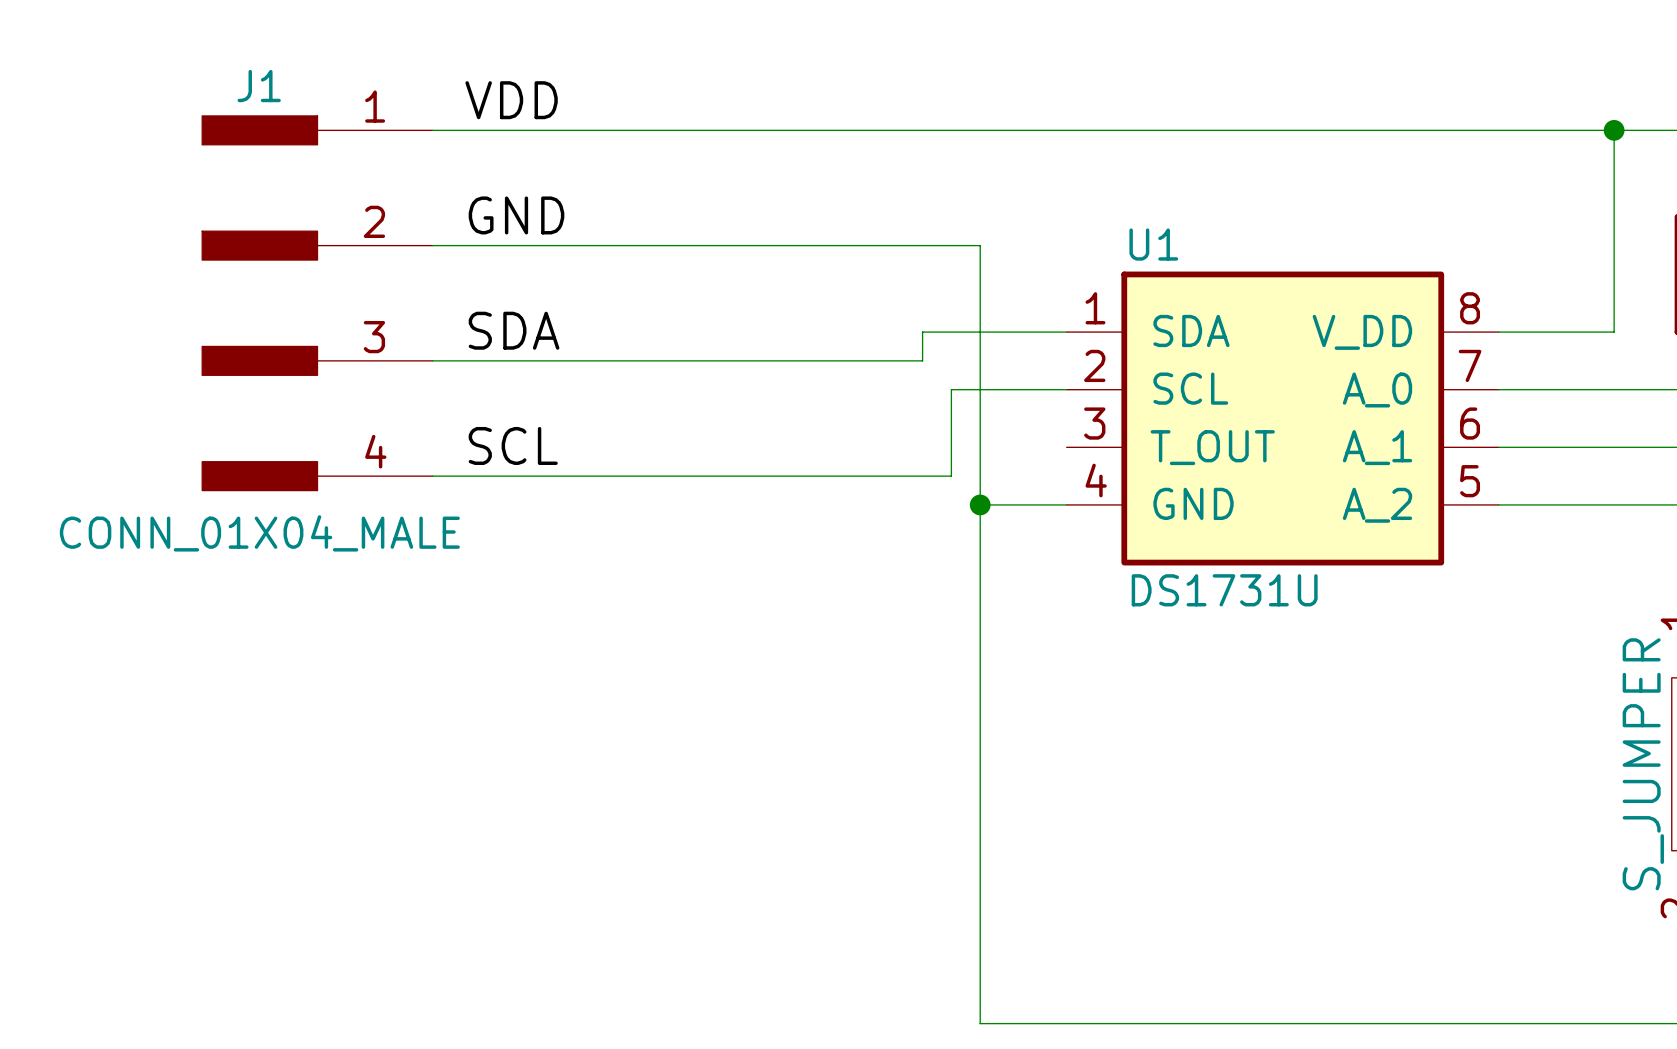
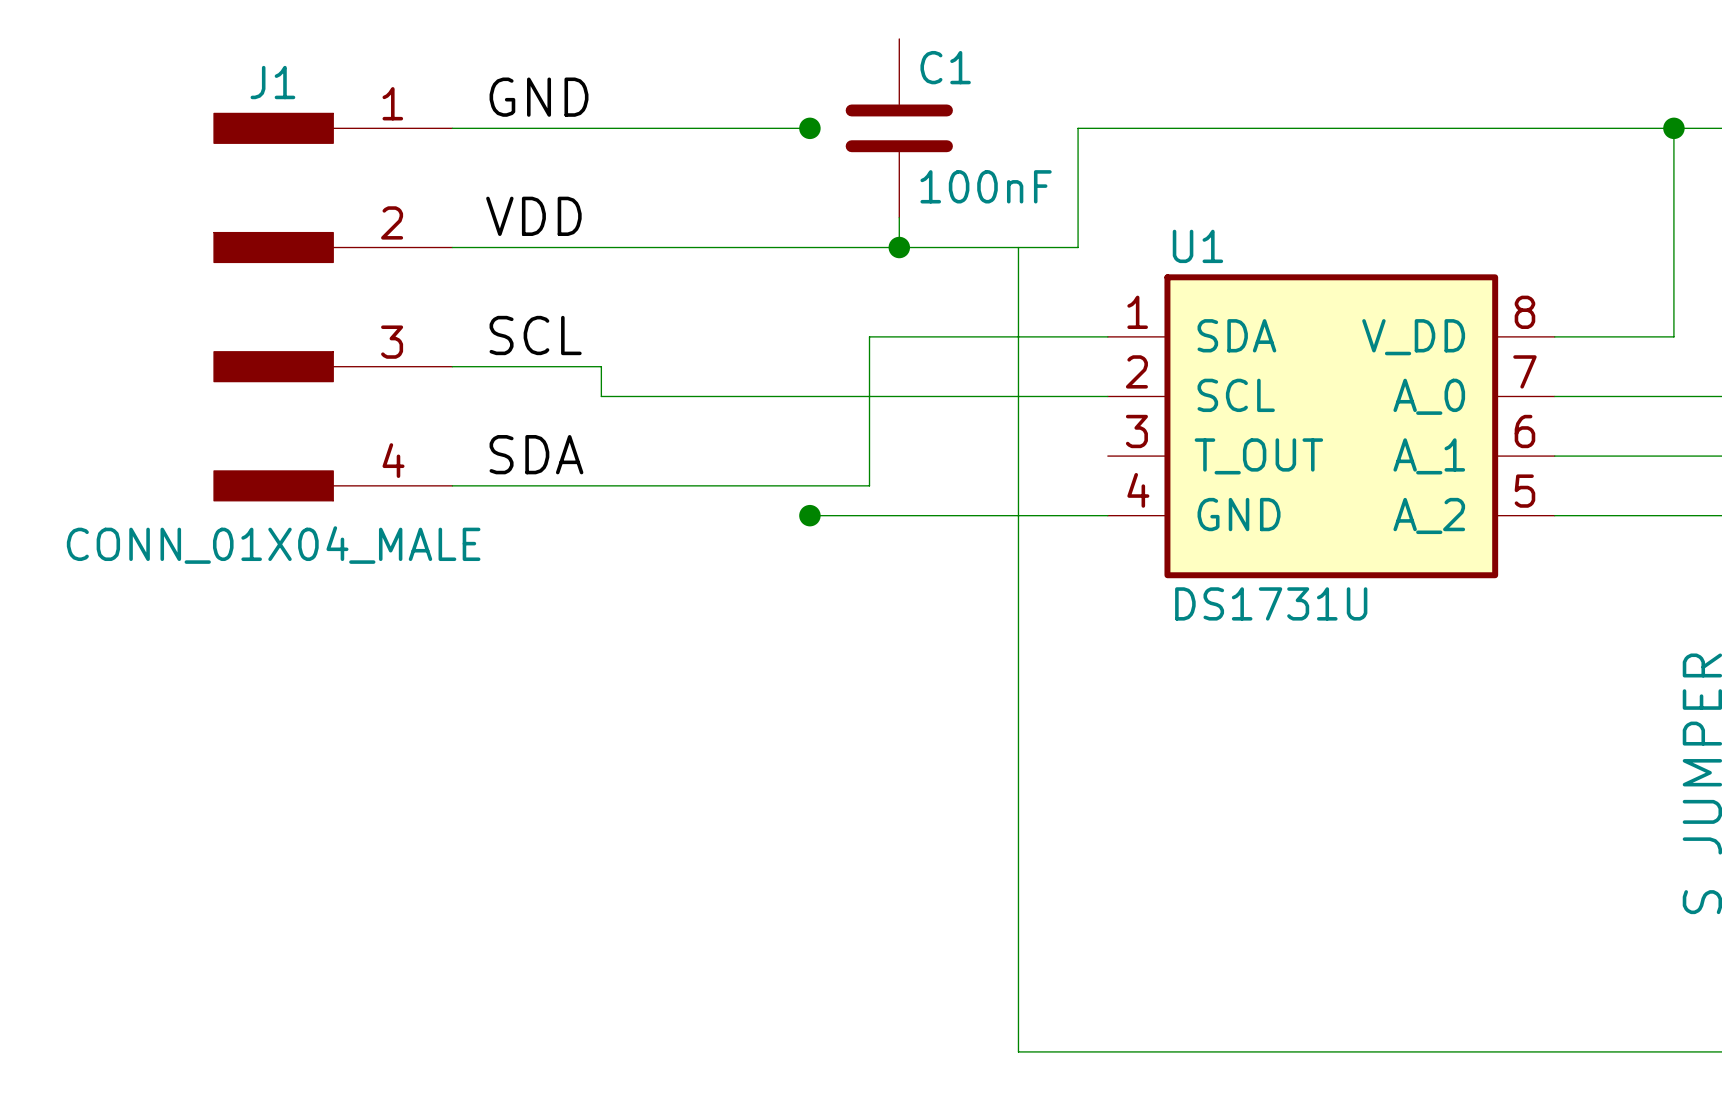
label: VDD (511, 100) -> GND (539, 97)
wire: (778, 130) (1037, 130) -> (1018, 247) (1078, 247) (1078, 128)
junction: none -> (809, 128)
C1: none -> 100nF (899, 128)
label: GND (516, 215) -> VDD (533, 216)
wire: none -> (899, 217) (899, 247)
junction: none -> (899, 247)
label: SDA (514, 330) -> SCL (535, 335)
wire: (922, 332) (922, 360) (576, 360) -> (988, 396) (601, 396) (601, 366)
wire: (951, 389) (951, 476) (836, 476) -> (958, 336) (869, 336) (869, 485)
label: SCL (513, 445) -> SDA (536, 454)
wire: none -> (809, 515) (1018, 515)
junction: none -> (809, 515)
junction: (980, 504) -> none

